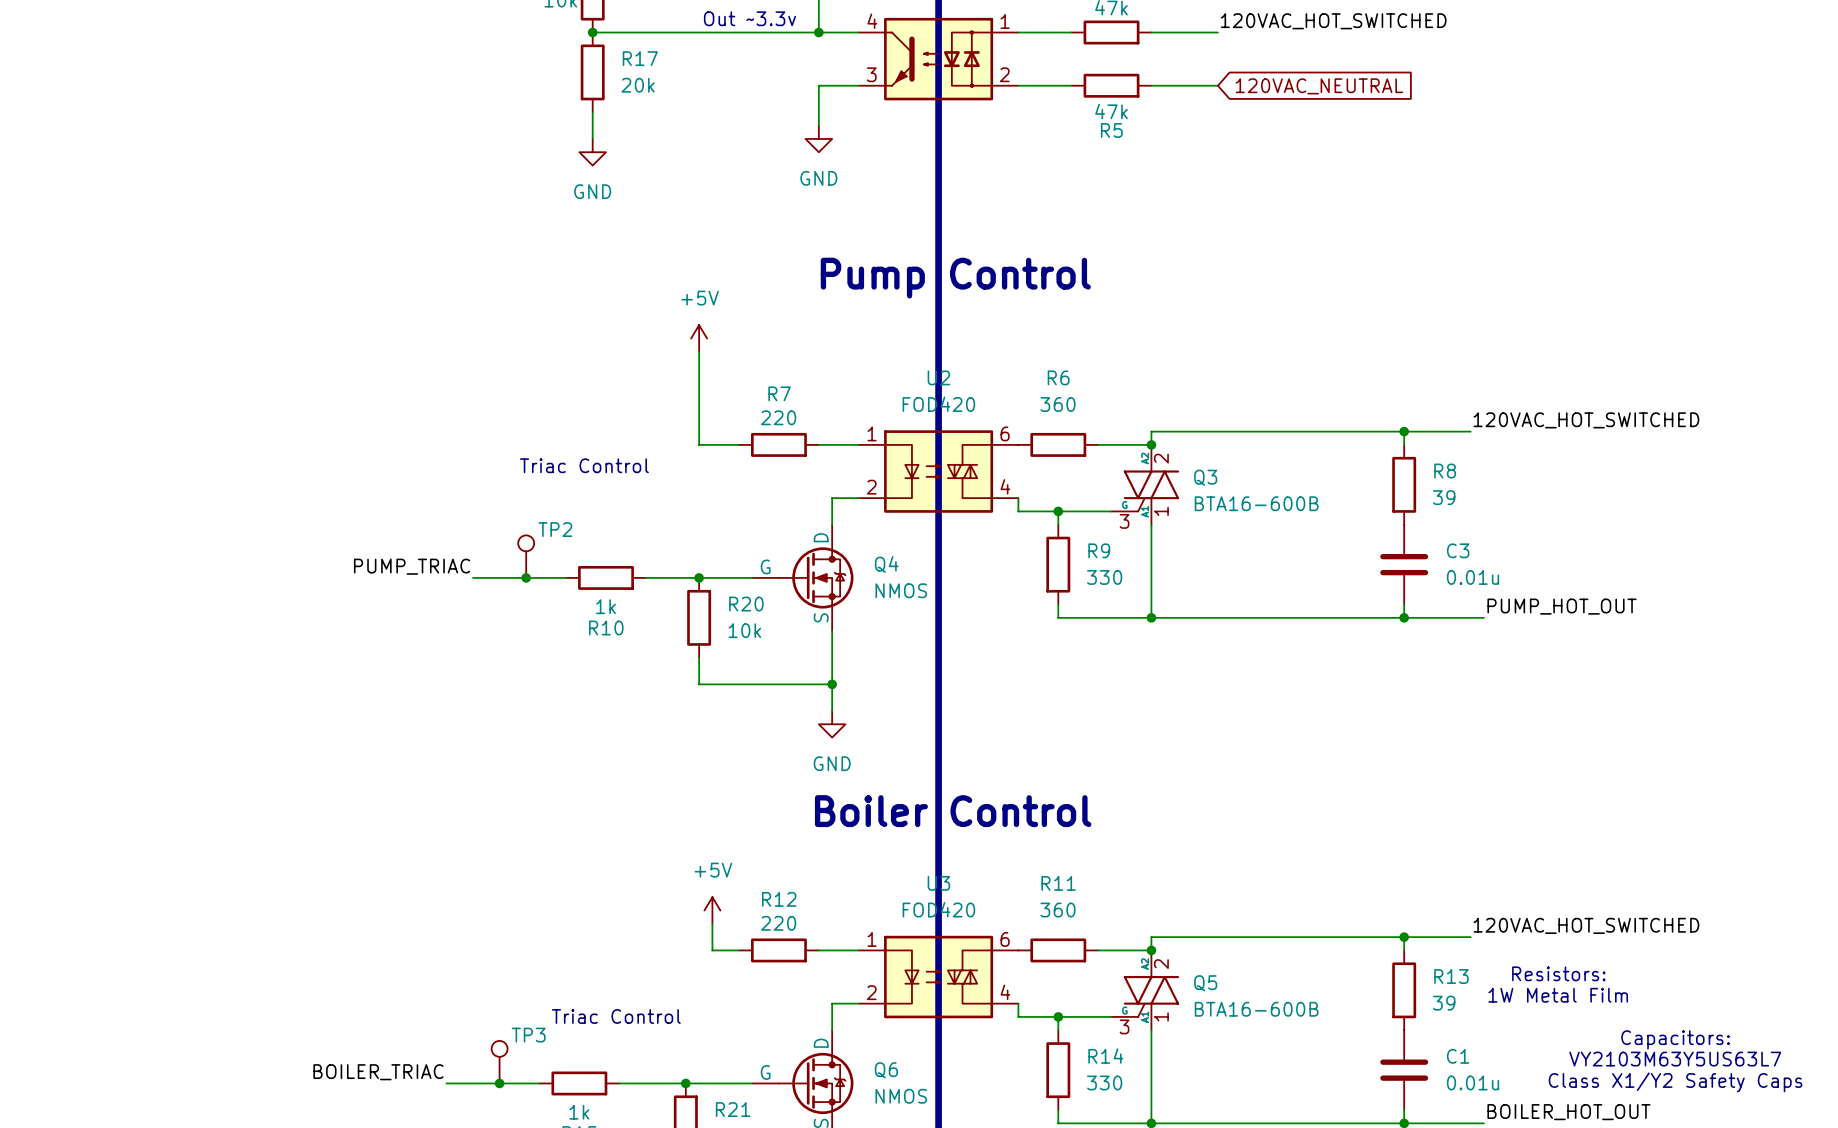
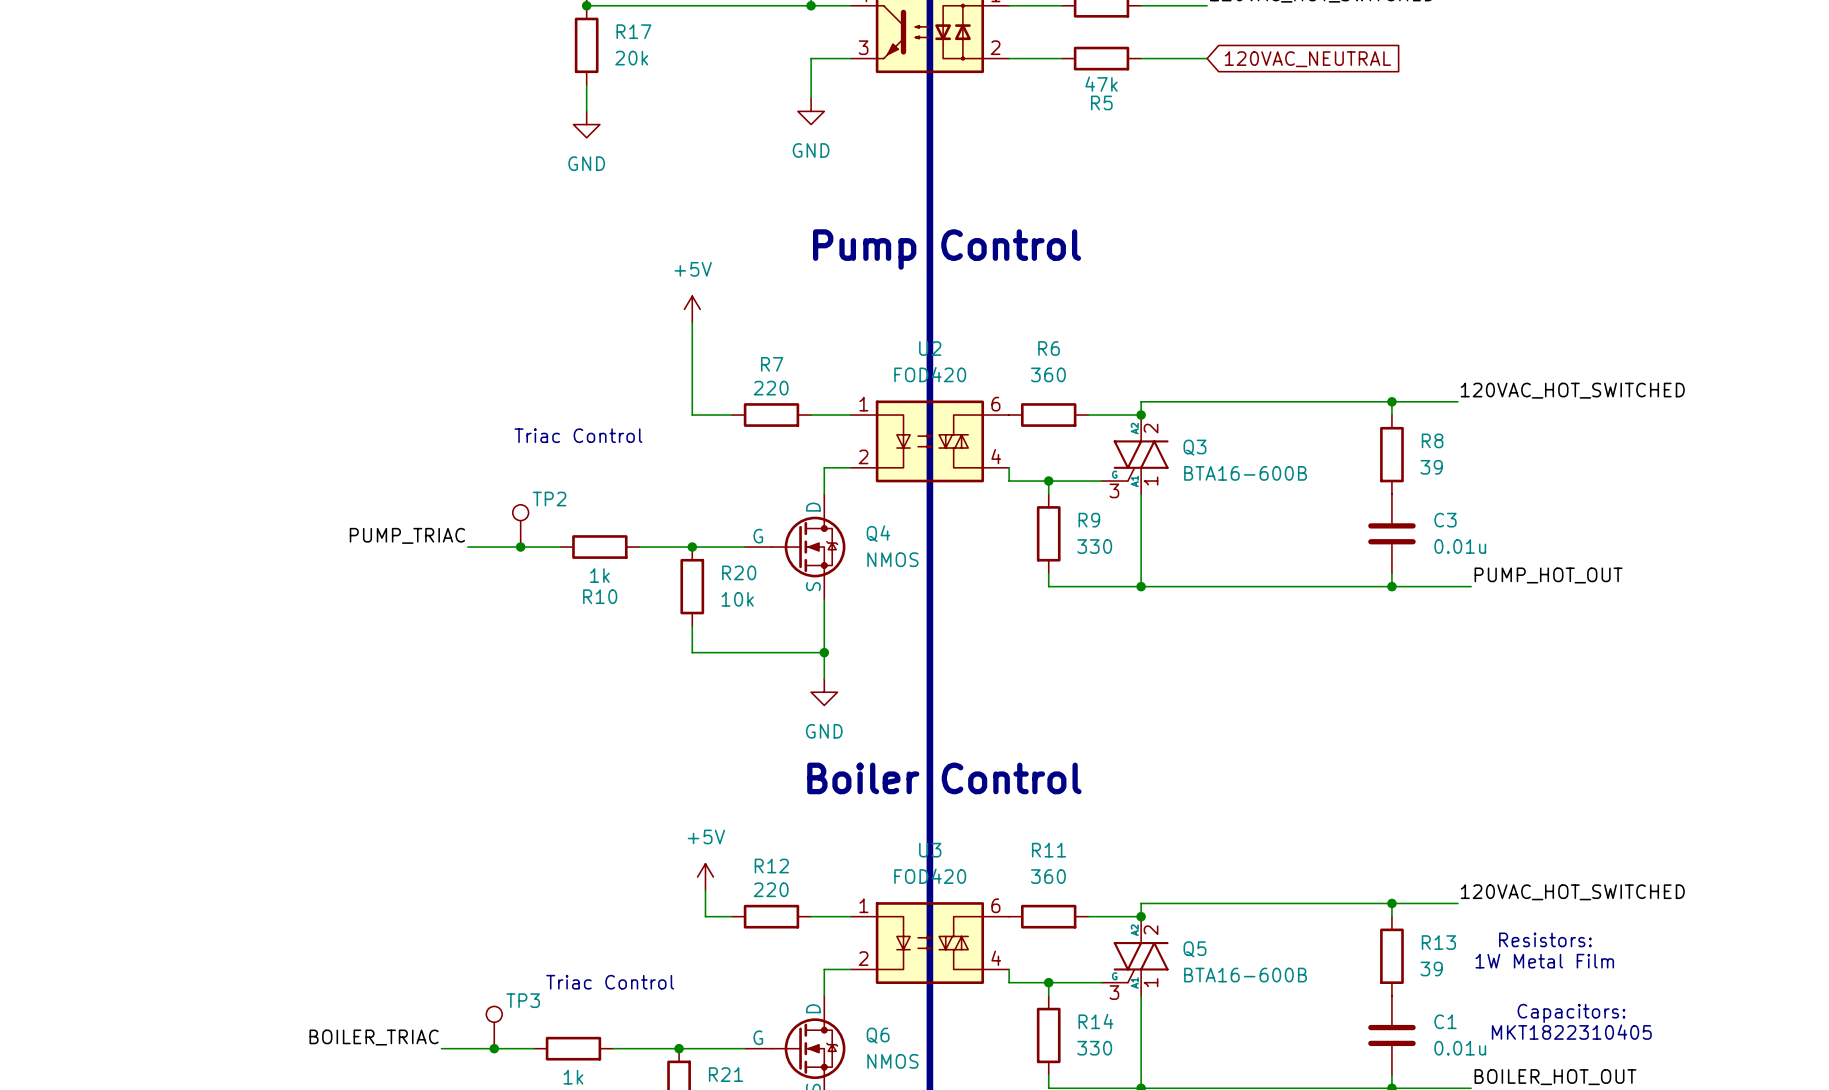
text position: Capacitors: (1675, 1039) -> Capacitors: (1571, 1013)
text: VY2103M63Y5US63L7 (1675, 1059) -> none
text: none -> MKT1822310405 (1571, 1032)
text: Class X1/Y2 Safety Caps (1675, 1082) -> none

